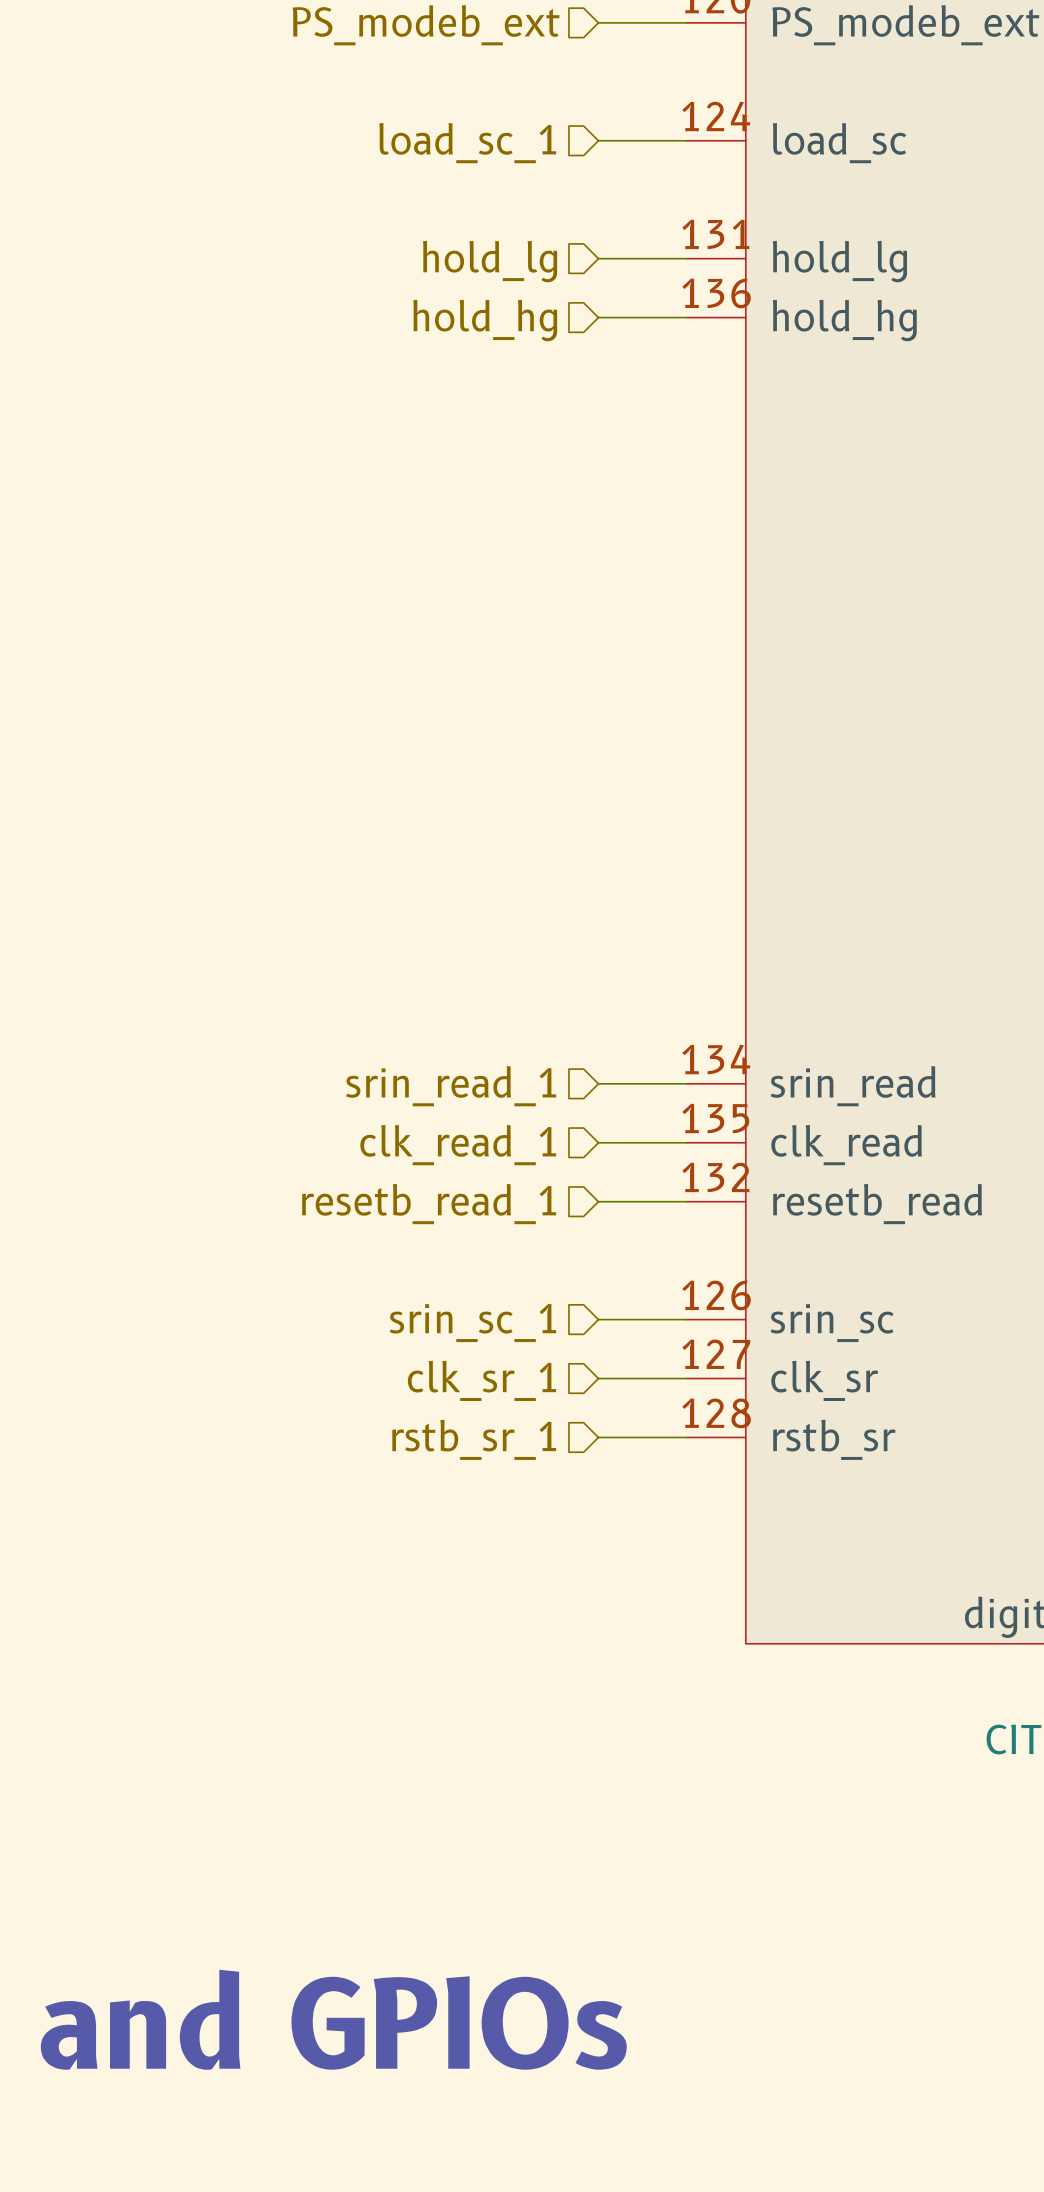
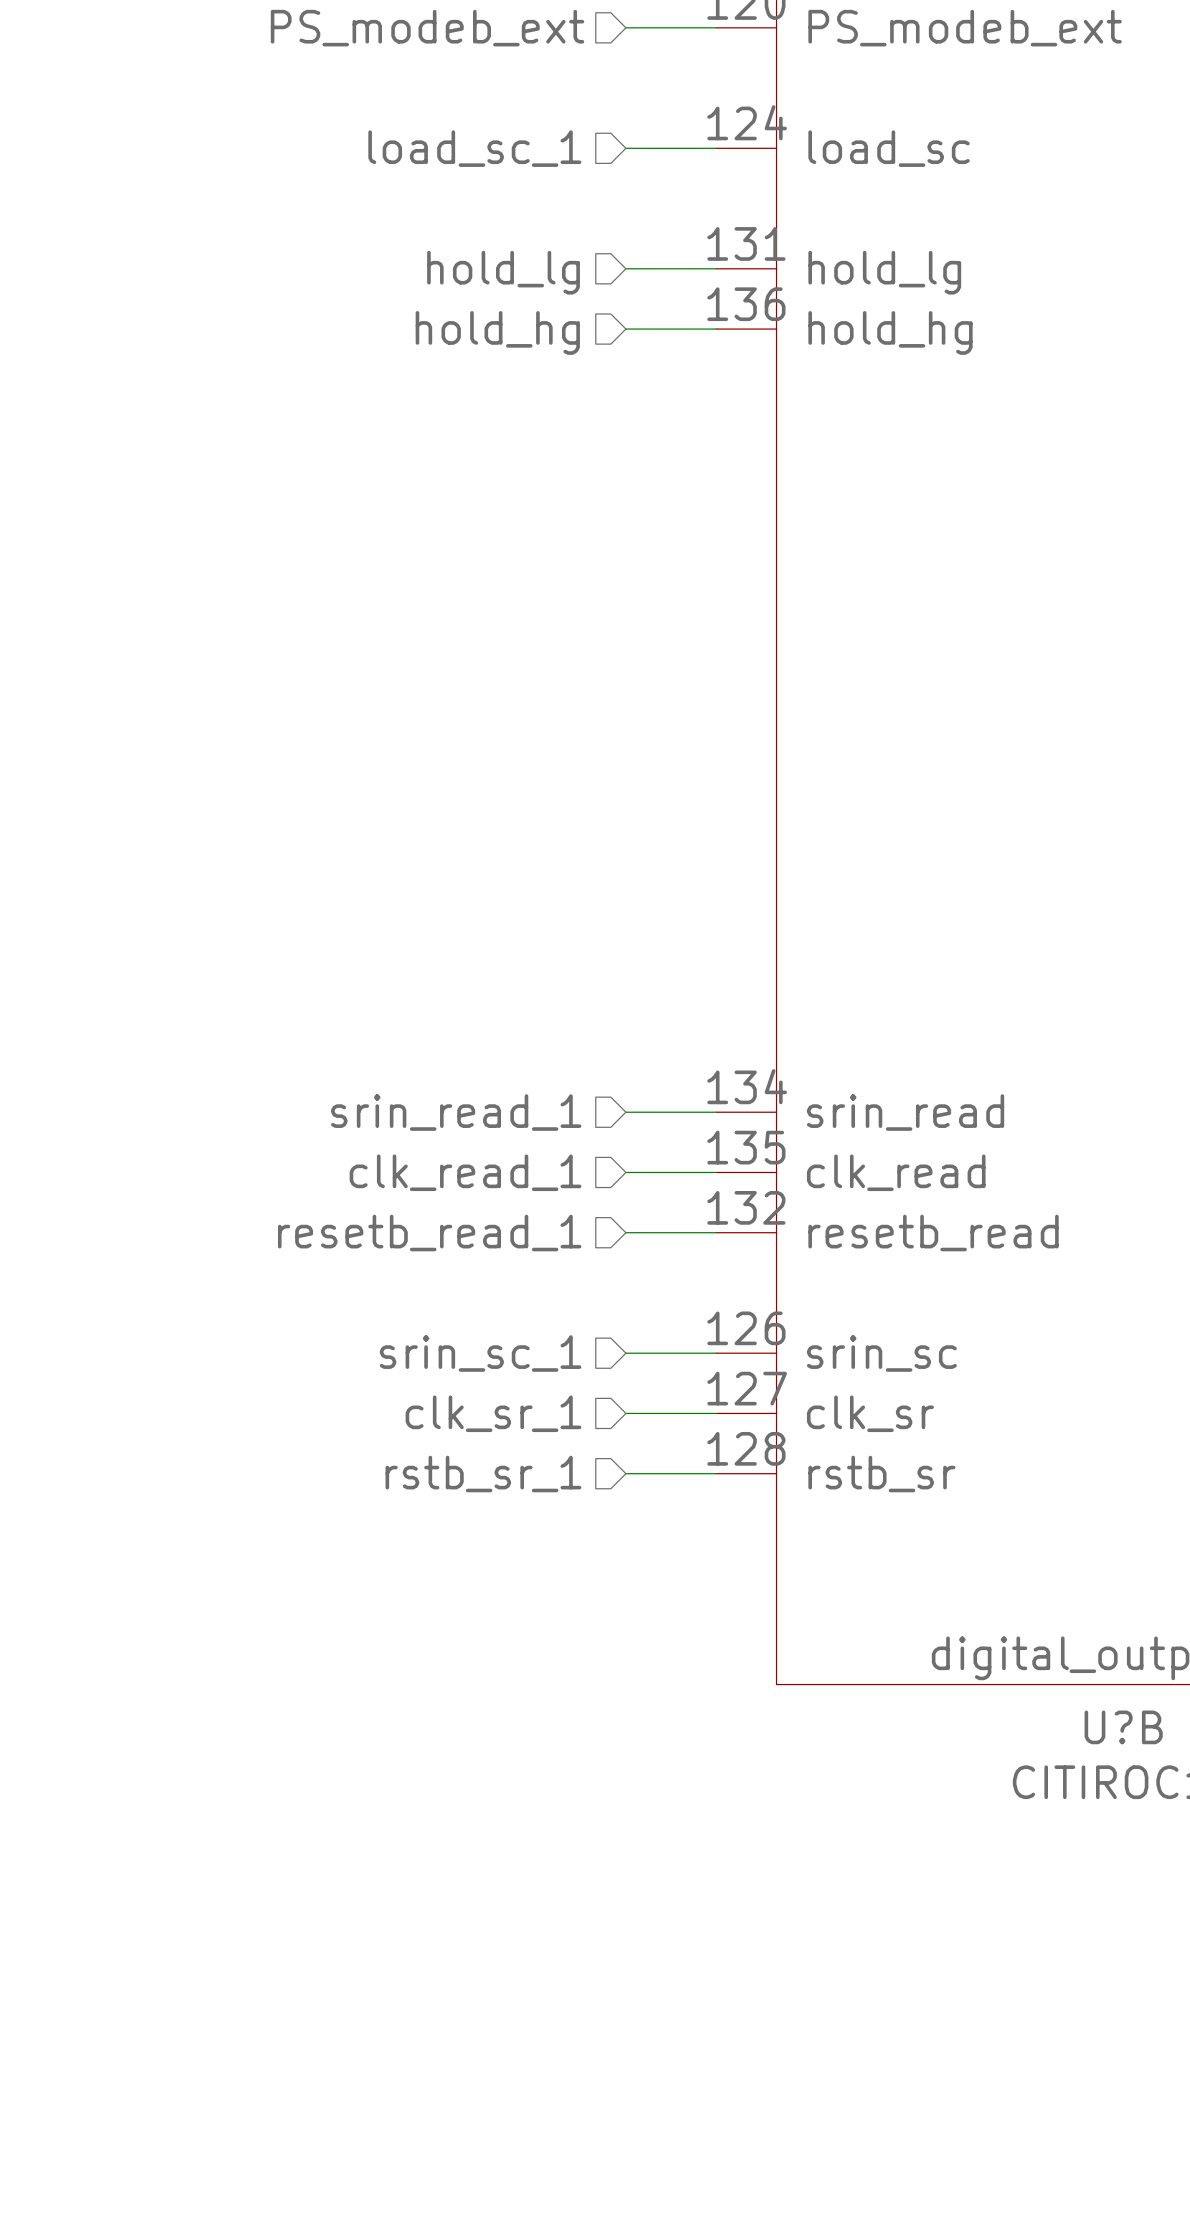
text: and GPIOs (333, 2019) -> none

